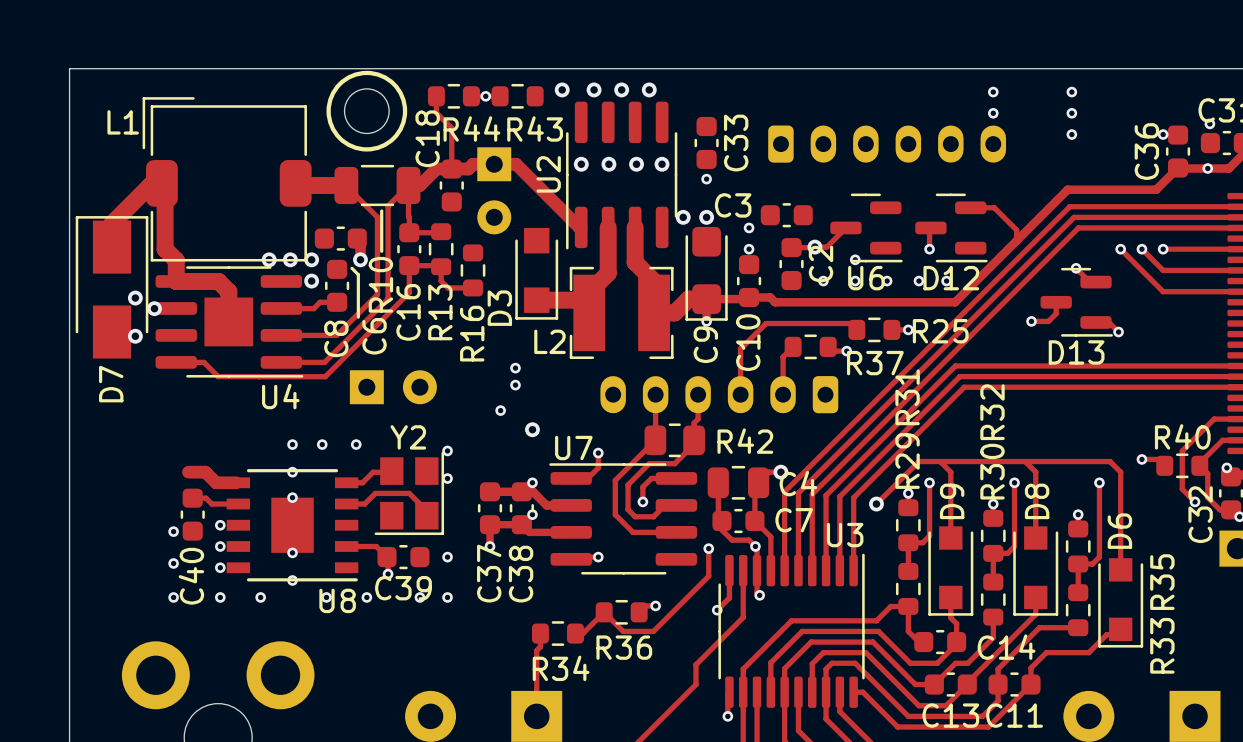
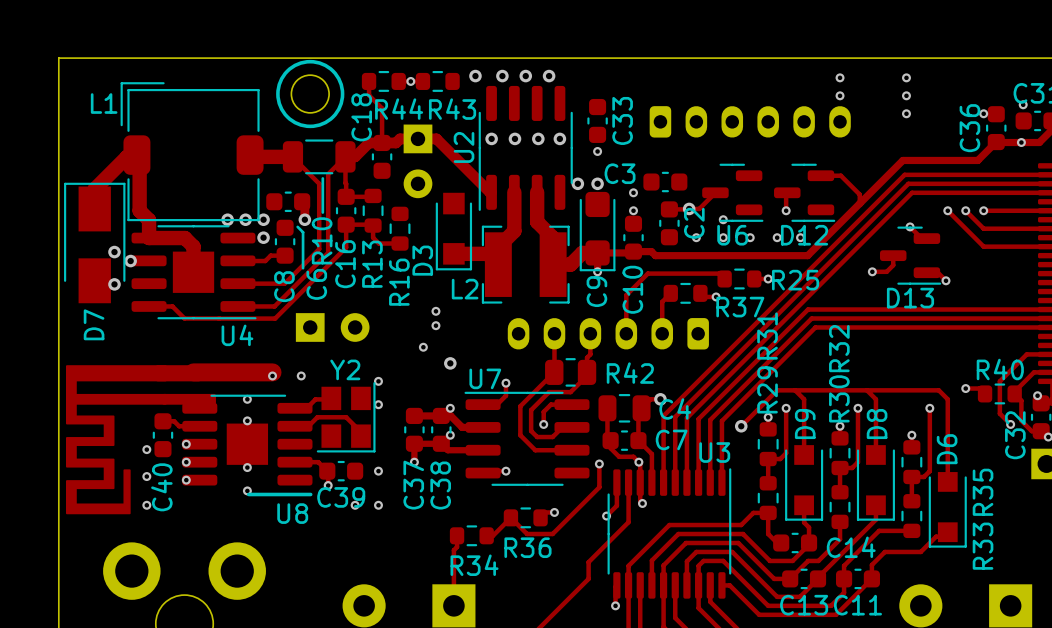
drawing: none -> [155, 365, 216, 405]
track: none -> (193, 372) (272, 372)
via: (292, 444) -> none
U8 footprint: [226, 469, 359, 582] -> [182, 394, 313, 497]
track: (188, 472) (205, 472) (216, 482) (236, 482) -> none
part: none -> (116, 439)
via: (220, 597) -> none
via: (260, 597) -> none
via: (326, 597) -> none
via: (366, 597) -> none

